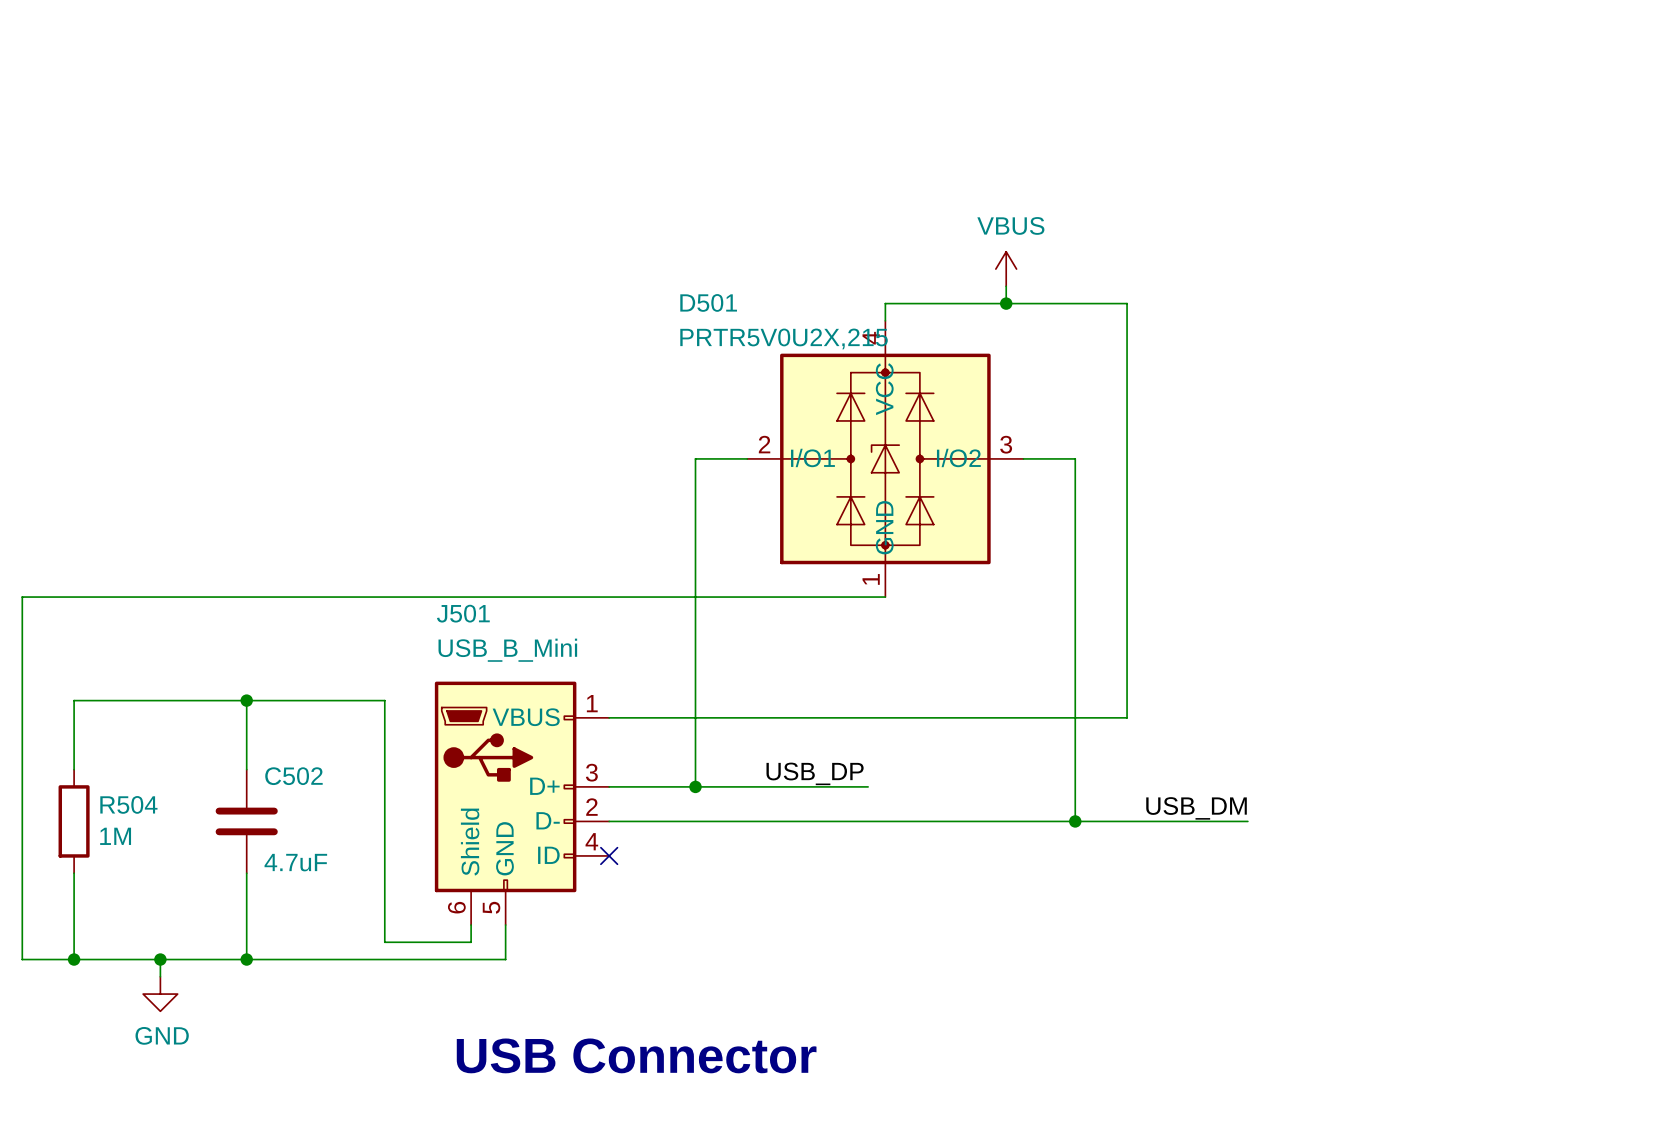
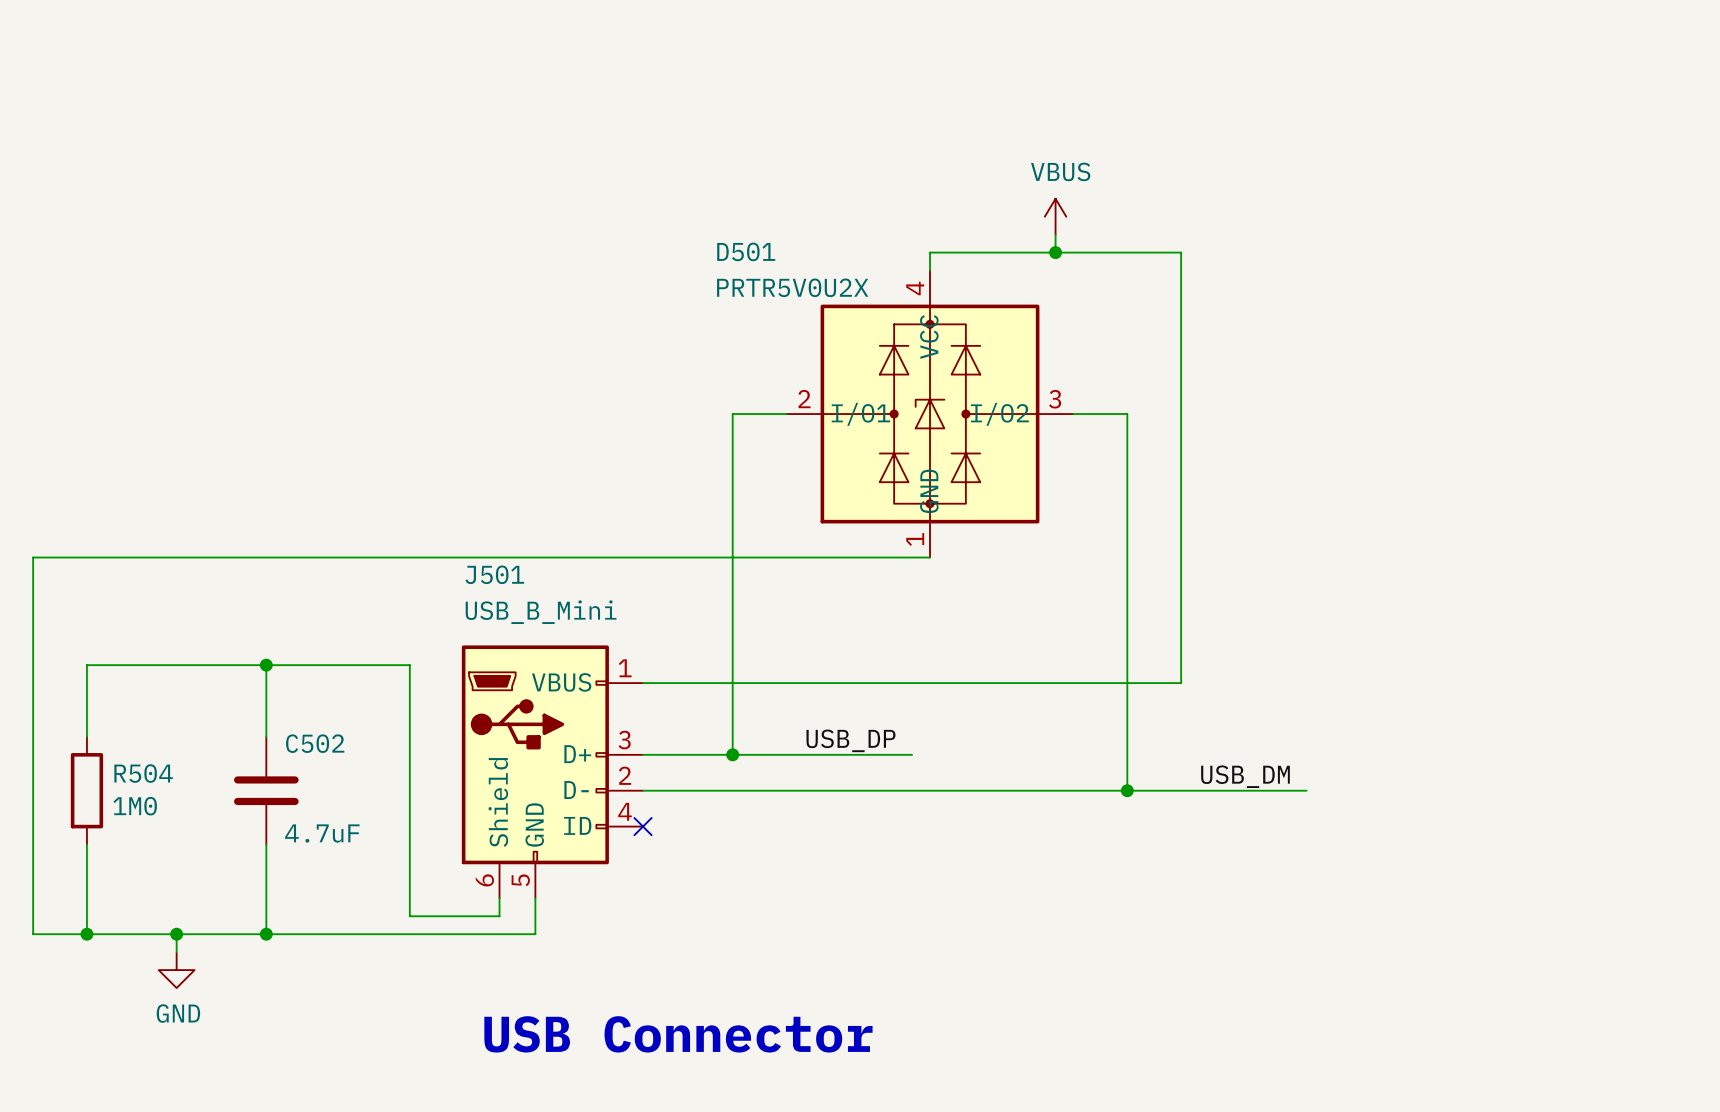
D501 value: PRTR5V0U2X,215 (784, 338) -> PRTR5V0U2X (792, 287)
R504 value: 1M (115, 836) -> 1M0 (135, 806)

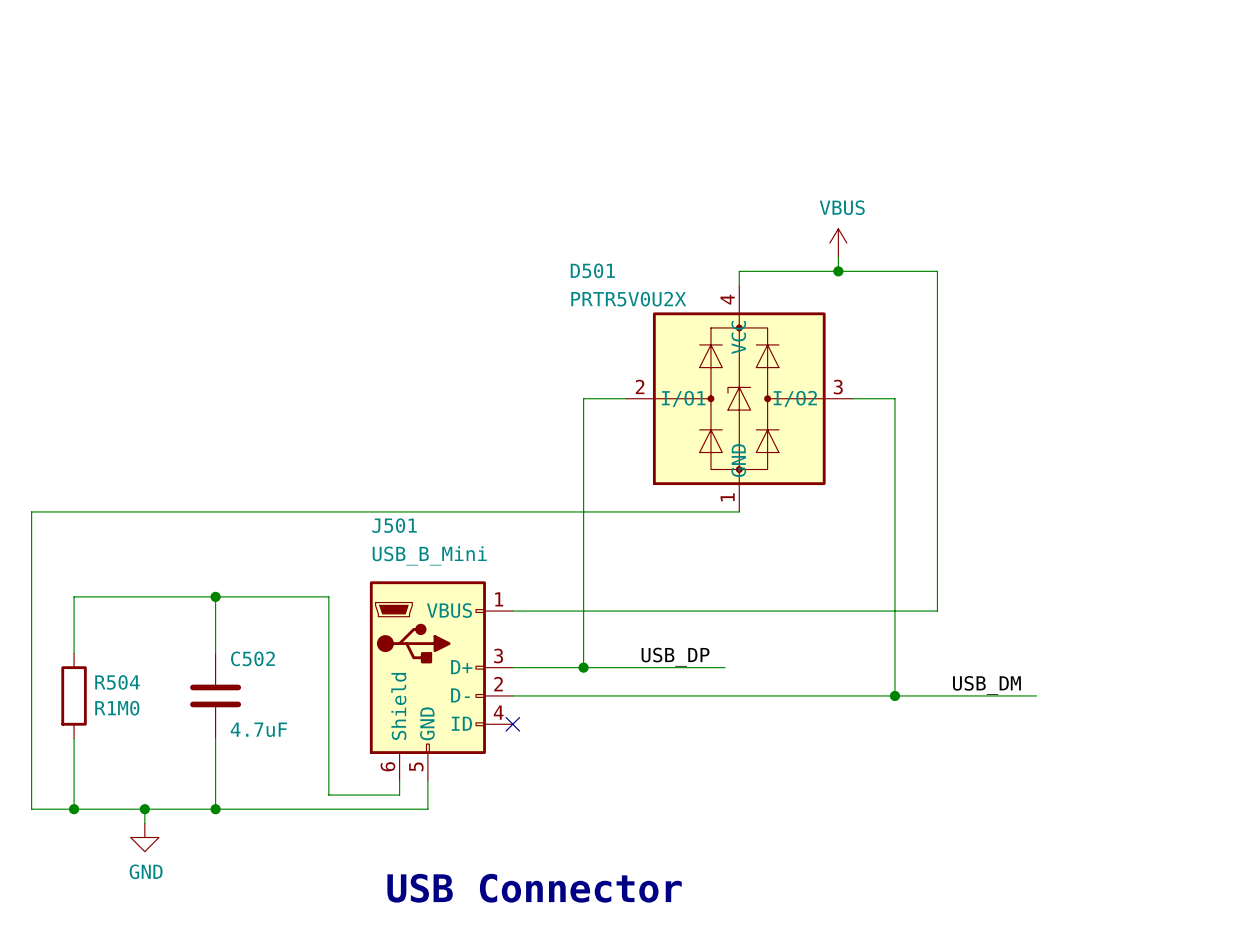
R504 value: 1M0 (135, 806) -> R1M0 (117, 708)

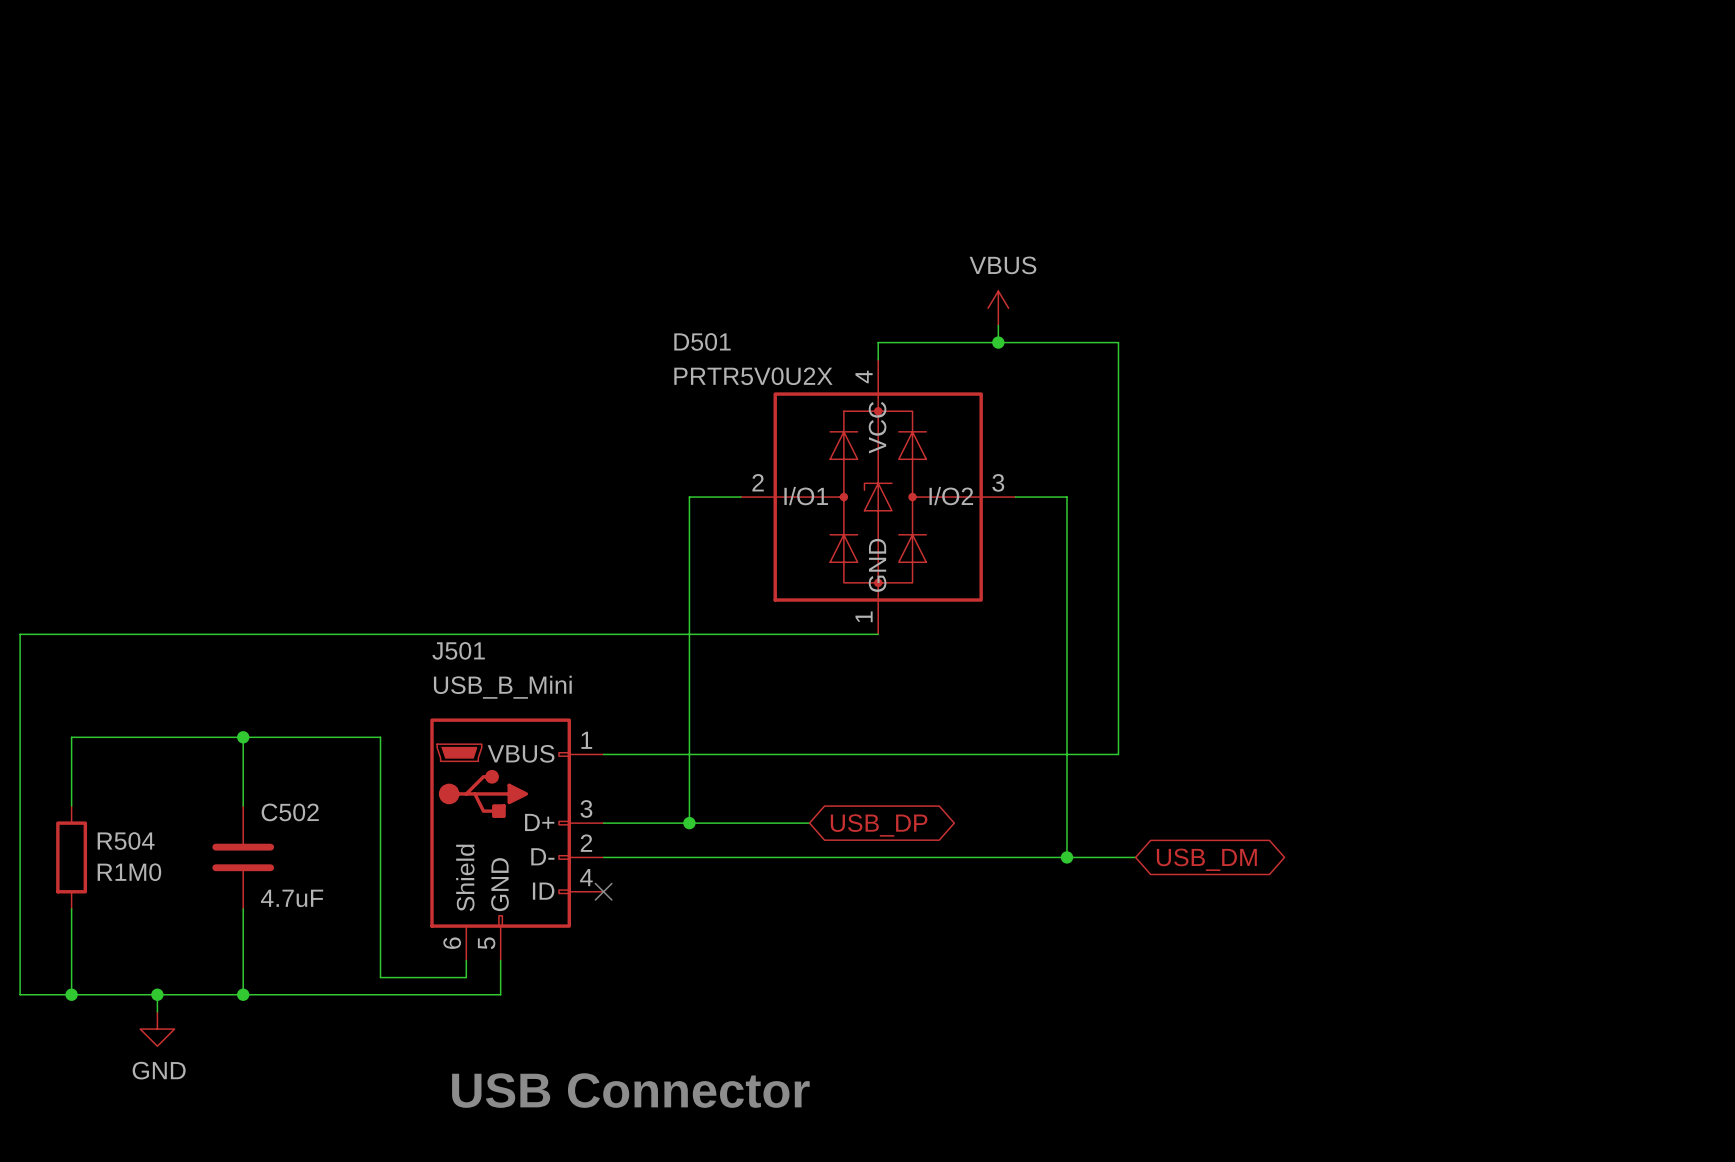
label: USB_DP (675, 657) -> none
wire: (682, 667) (725, 667) -> none
global label: none -> USB_DP (879, 825)
label: USB_DM (986, 685) -> none
wire: (951, 695) (1036, 695) -> none
global label: none -> USB_DM (1206, 859)

